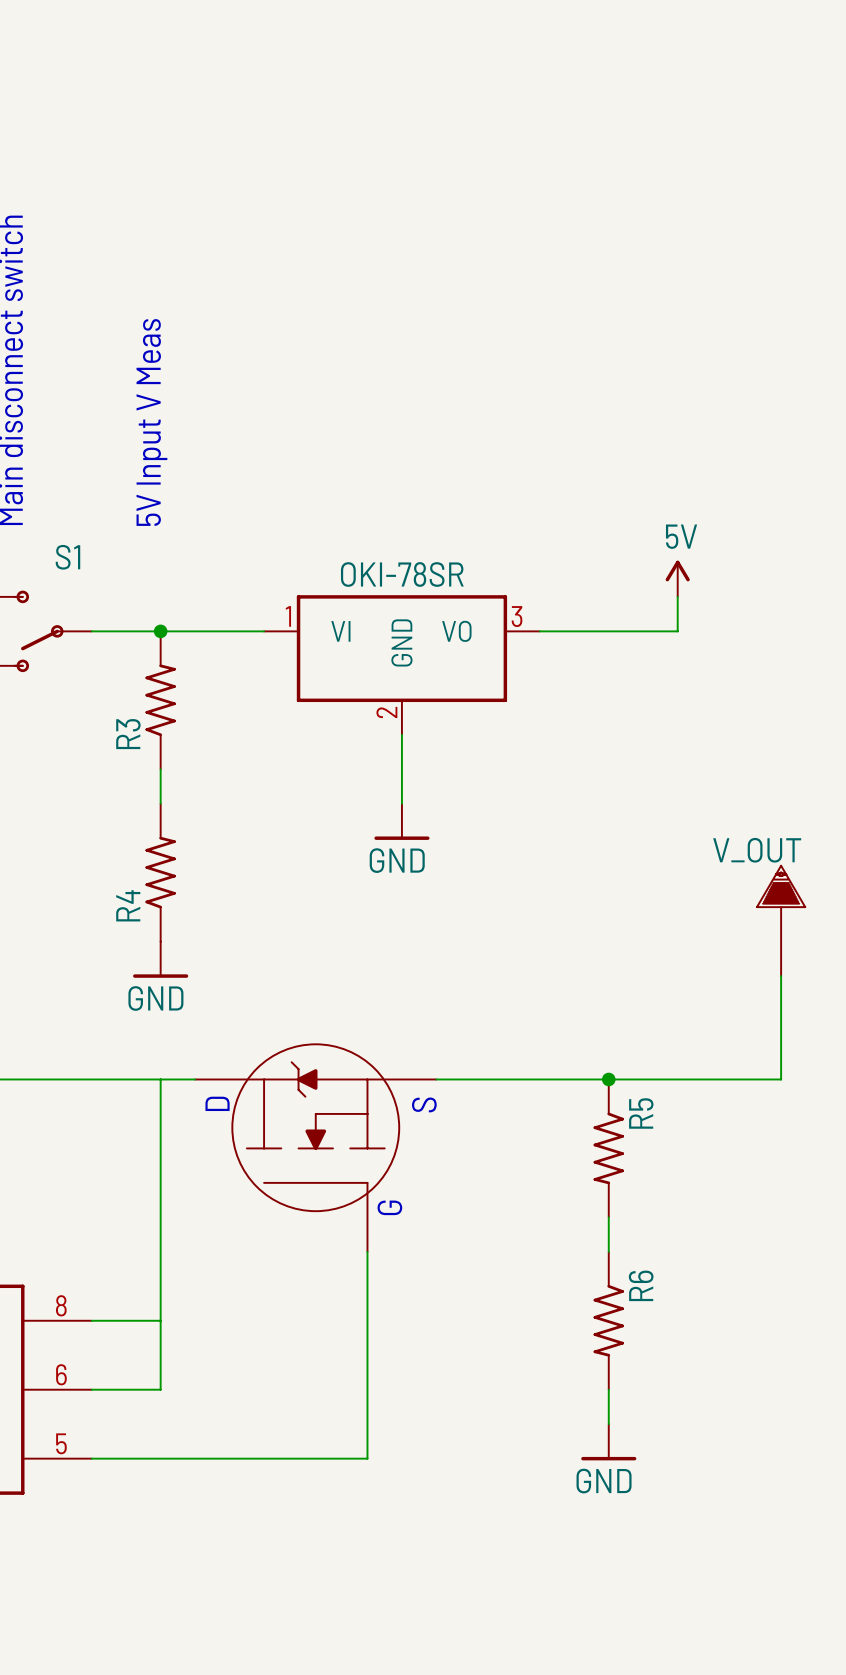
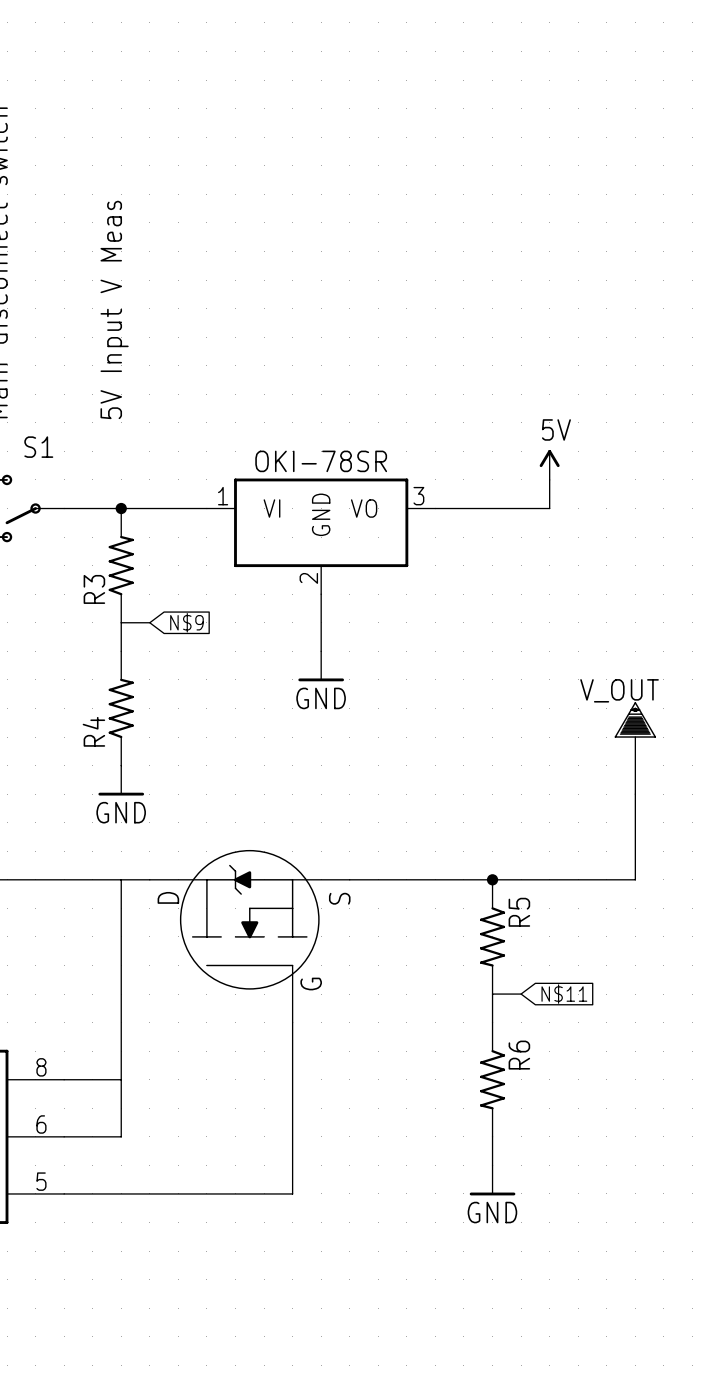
wire: none -> (121, 622) (149, 622)
global label: none -> N$9 (186, 622)
wire: none -> (492, 994) (521, 994)
global label: none -> N$11 (564, 994)

